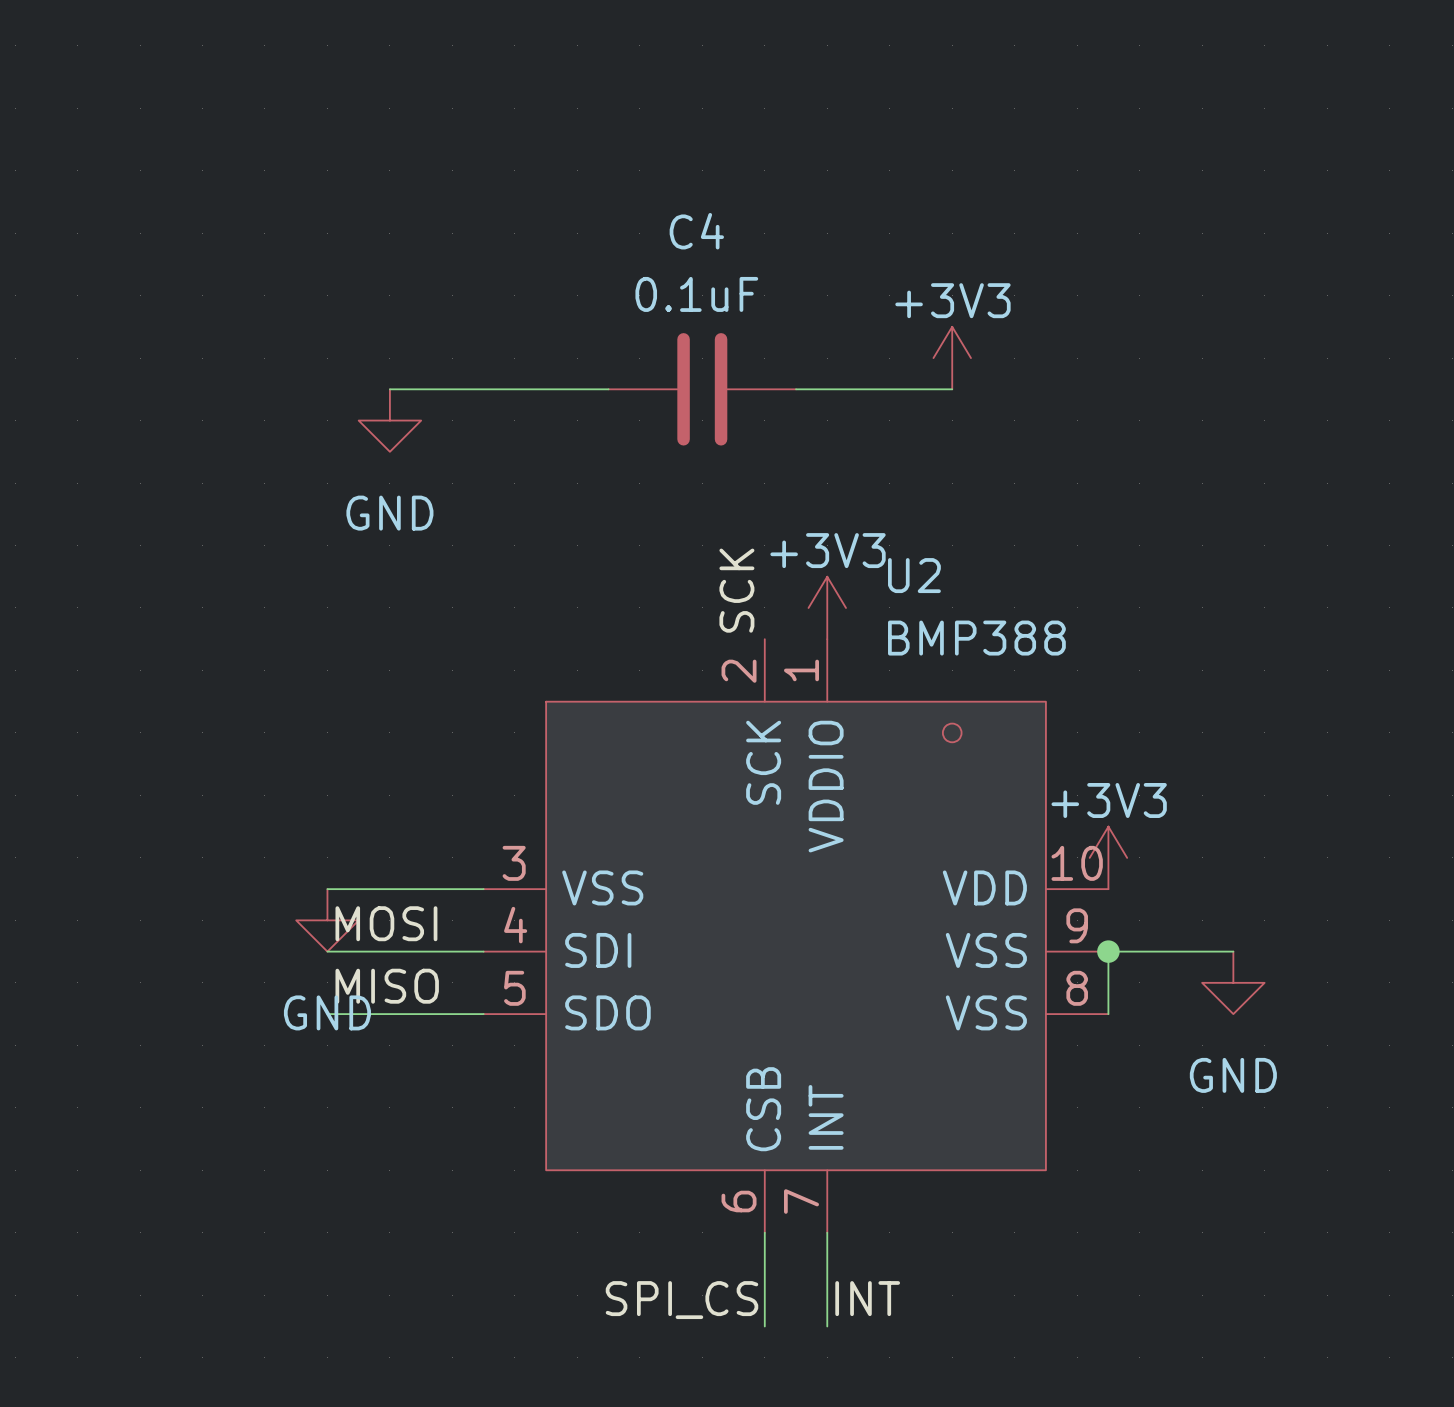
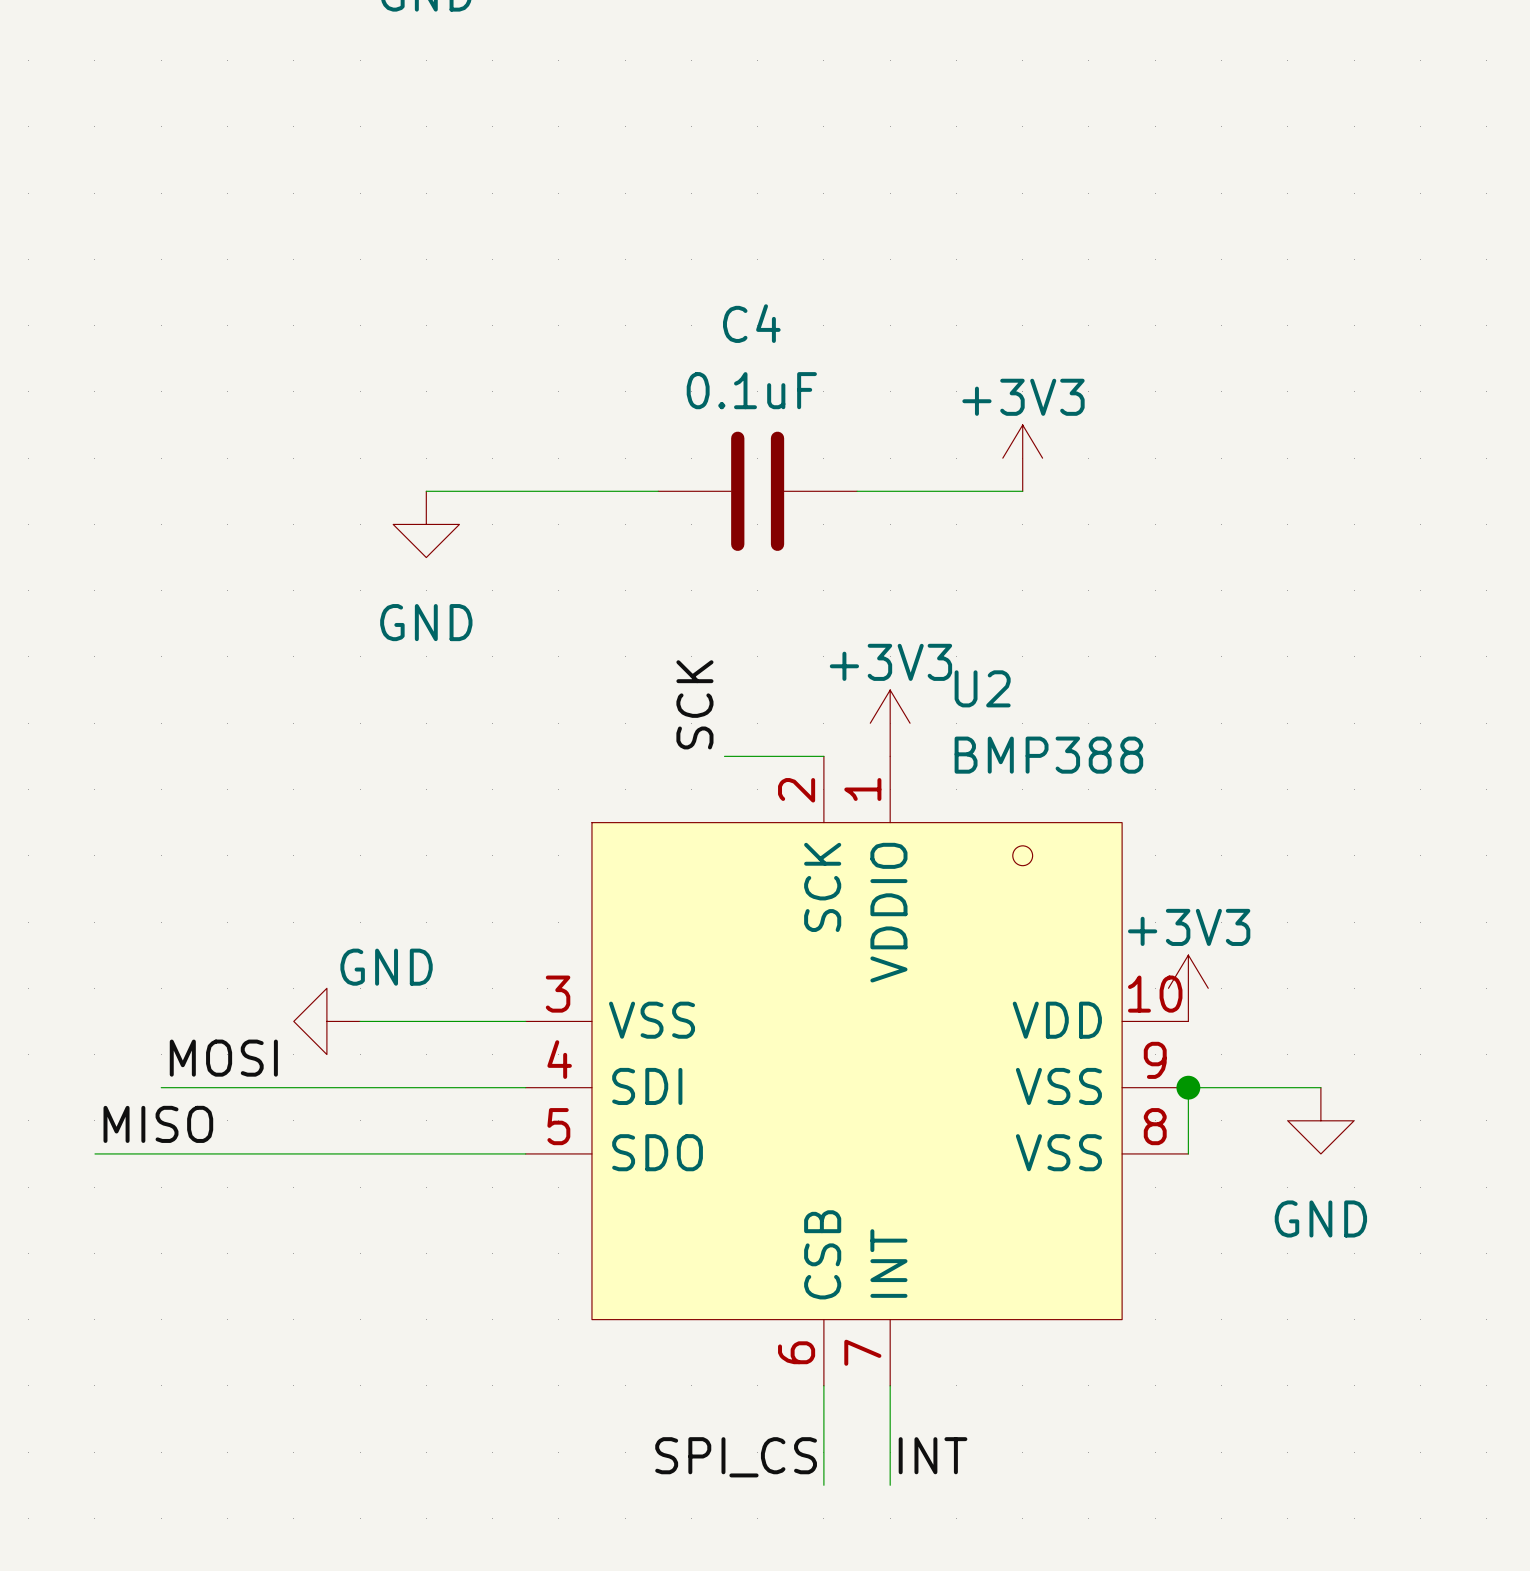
label position: SCK (736, 590) -> SCK (694, 704)
wire: none -> (724, 756) (823, 756)
power symbol rotation: 0° (327, 920) -> 90° clockwise (326, 1021)
power symbol position: GND (327, 920) -> GND (326, 1021)
label position: MOSI (386, 923) -> MOSI (223, 1058)
wire: none -> (161, 1087) (360, 1087)
label position: MISO (387, 986) -> MISO (158, 1124)
power symbol text position: GND (327, 1012) -> GND (386, 967)
wire: none -> (94, 1153) (360, 1153)

